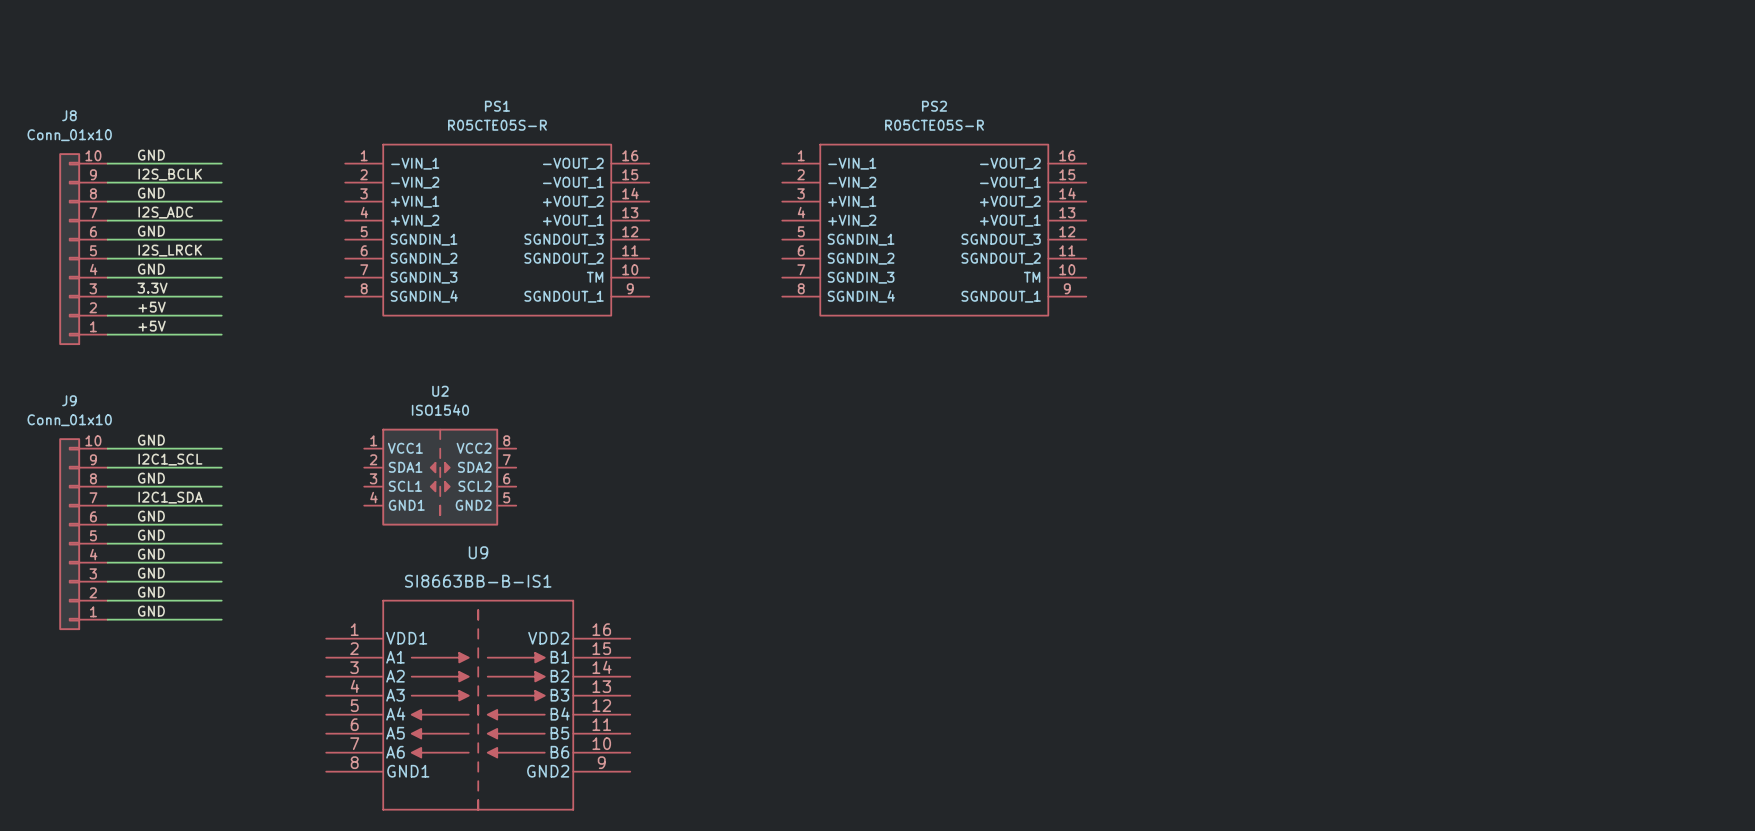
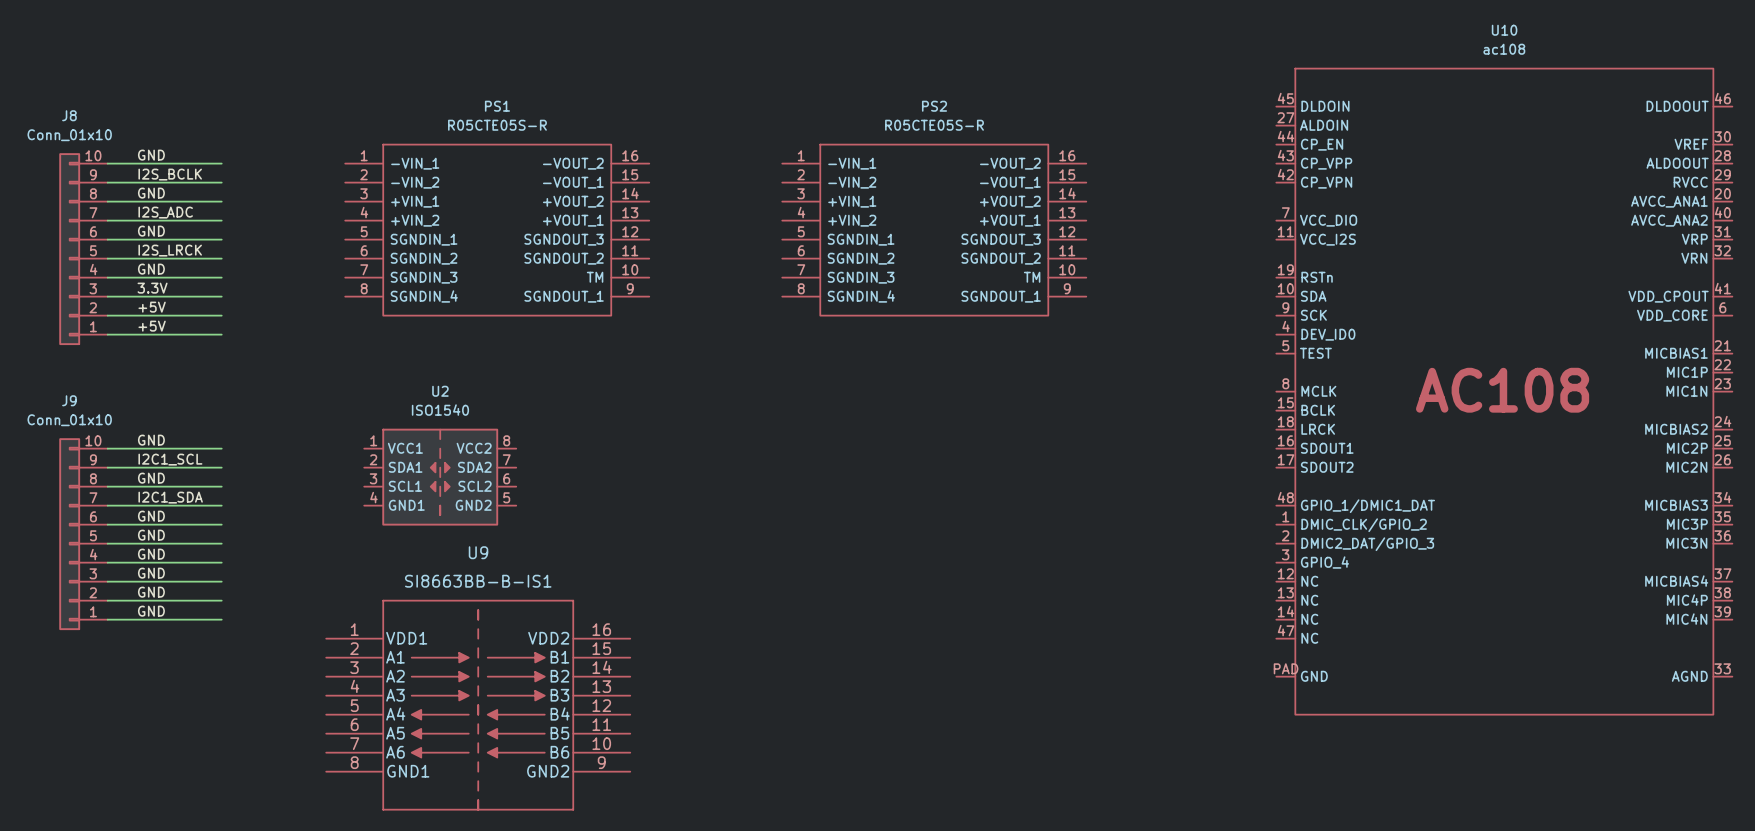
U10: none -> ac108 (1504, 391)

